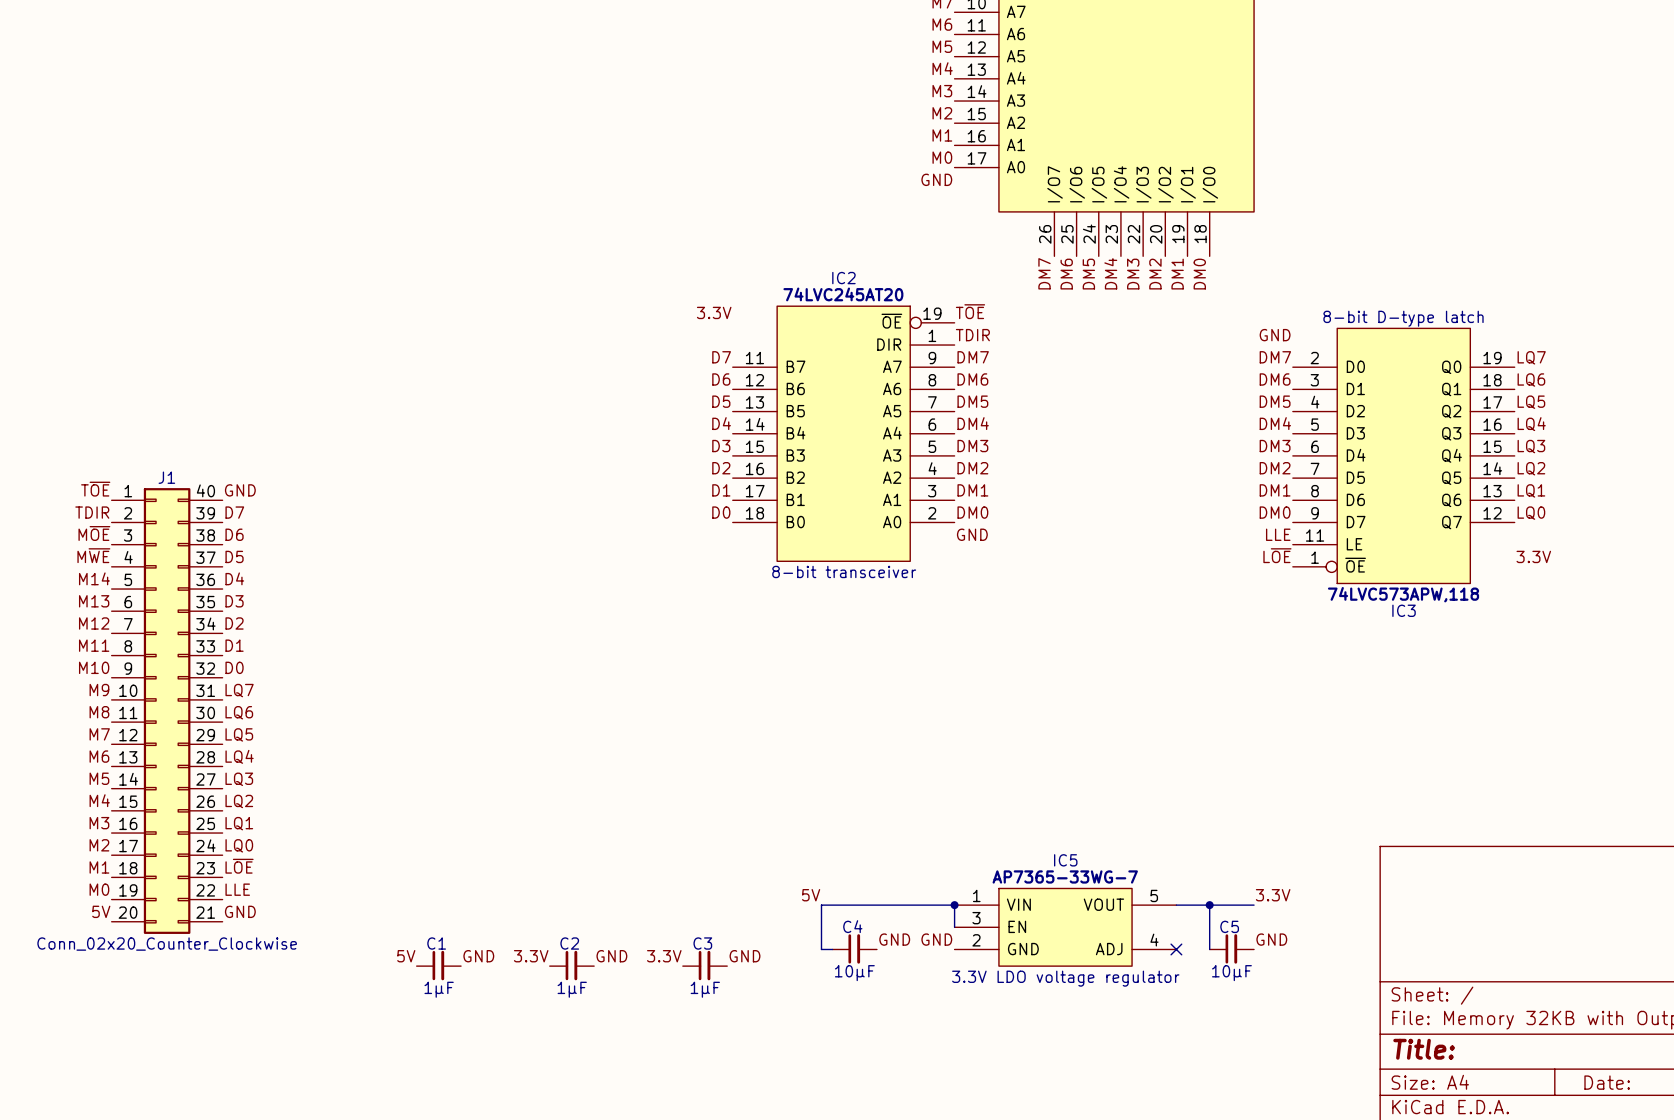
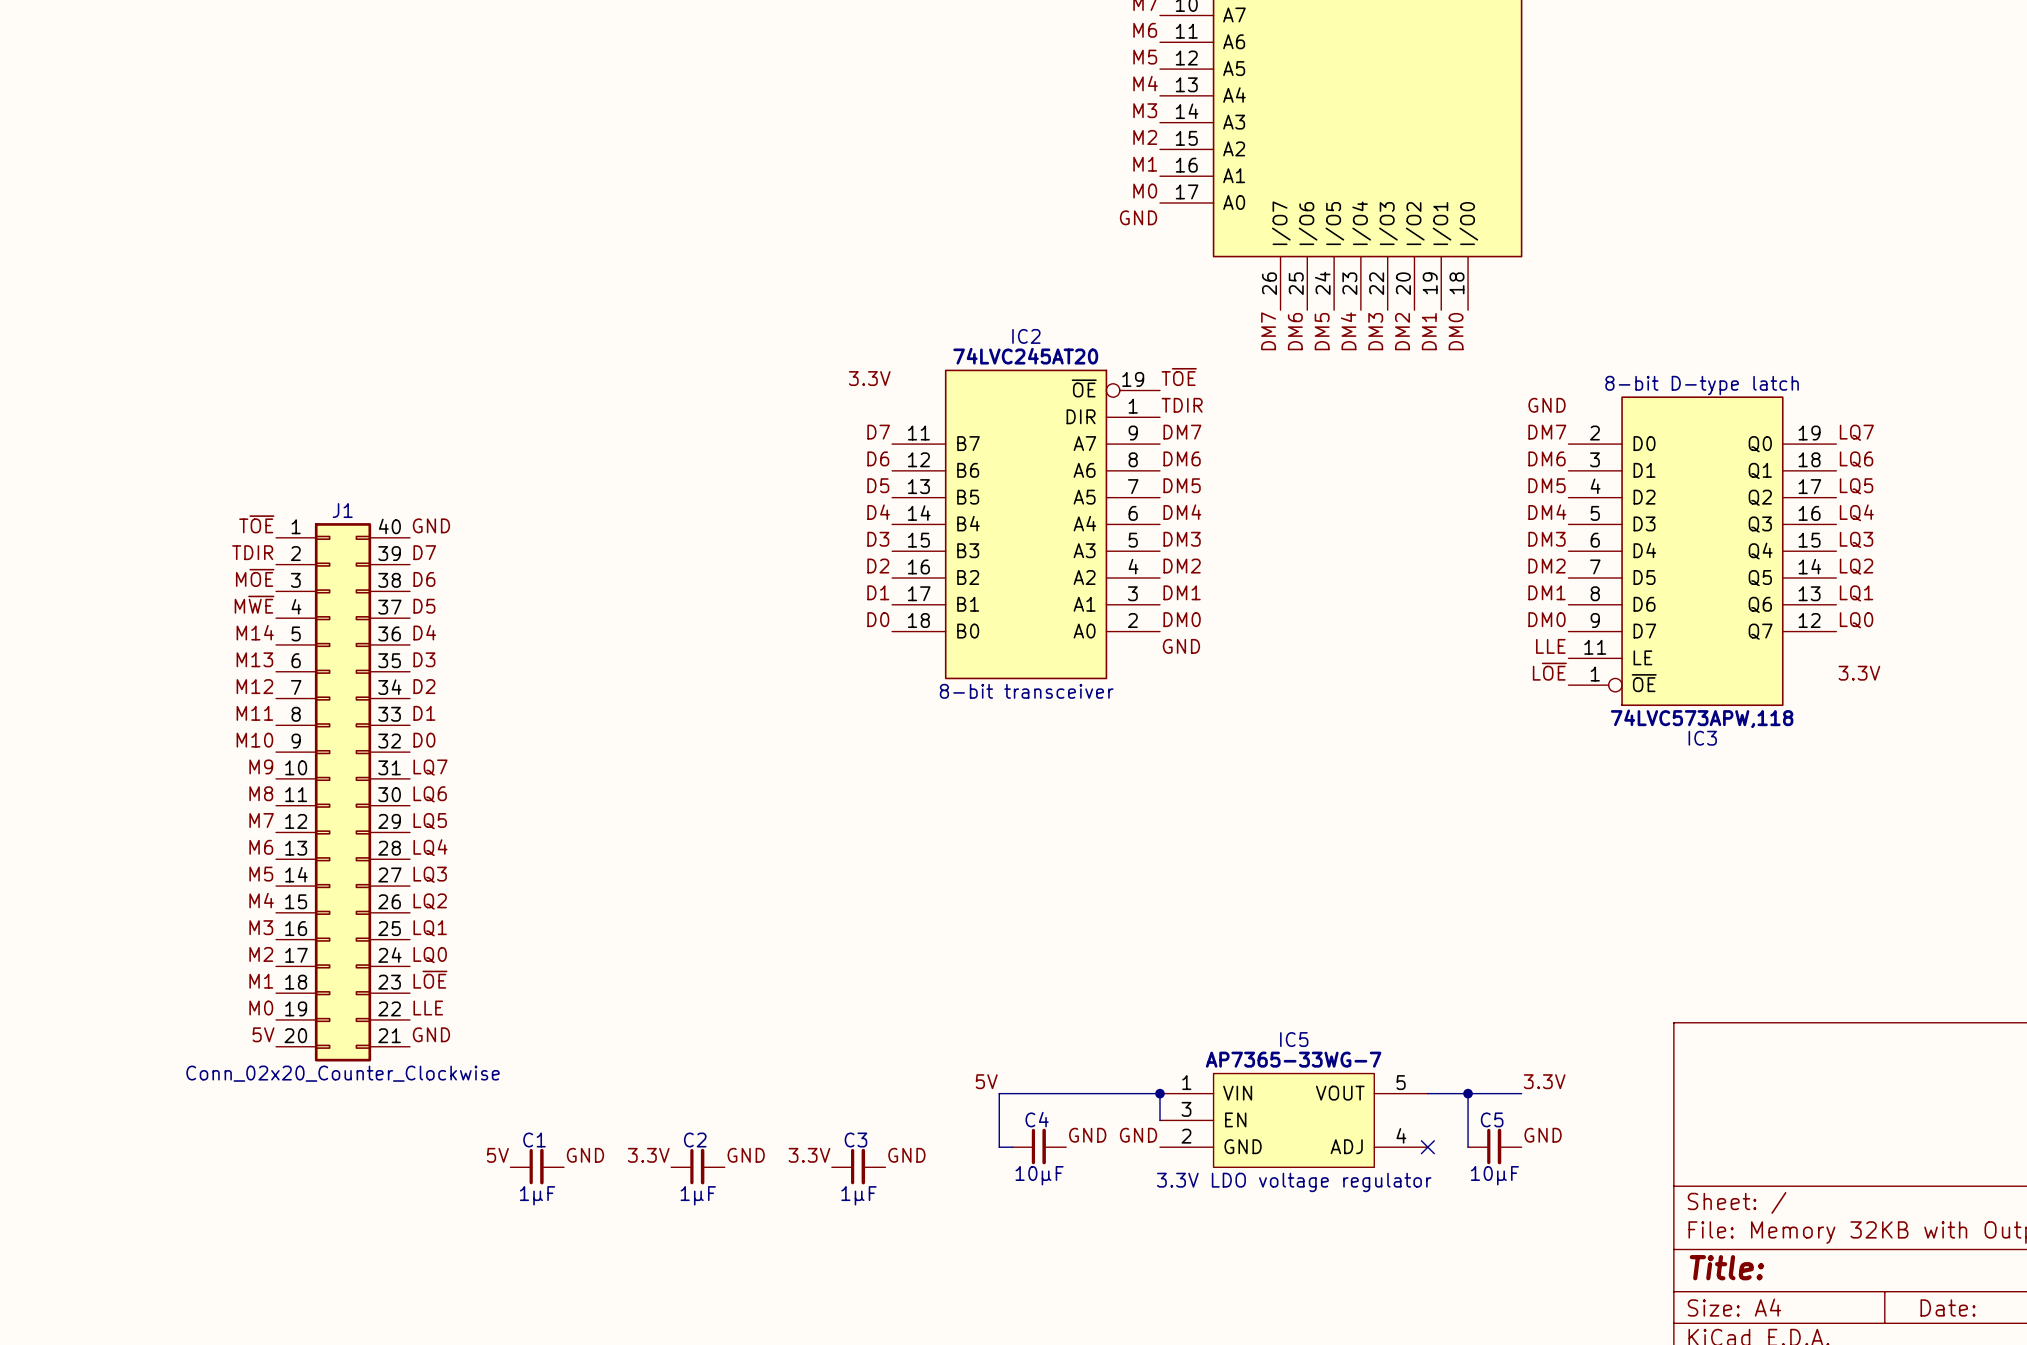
label position: T~{OE} (95, 489) -> T~{OE} (256, 524)
label position: GND (240, 490) -> GND (431, 525)
label position: TDIR (92, 512) -> TDIR (252, 552)
label position: D7 (234, 512) -> D7 (424, 552)
label position: M~{OE} (94, 533) -> M~{OE} (255, 577)
label position: D6 (234, 534) -> D6 (424, 579)
label position: M~{WE} (93, 555) -> M~{WE} (254, 604)
label position: D5 (234, 556) -> D5 (424, 606)
label position: M14 (94, 578) -> M14 (255, 632)
label position: D4 (234, 578) -> D4 (424, 632)
label position: M13 (94, 601) -> M13 (254, 659)
label position: D3 (234, 601) -> D3 (424, 659)
label position: M12 (94, 623) -> M12 (254, 686)
label position: D2 (234, 623) -> D2 (424, 686)
label position: M11 (94, 645) -> M11 (254, 713)
label position: D1 (234, 645) -> D1 (424, 713)
label position: M10 (94, 667) -> M10 (254, 740)
label position: D0 (234, 667) -> D0 (424, 740)
label position: M9 (99, 690) -> M9 (261, 766)
label position: LQ7 (239, 690) -> LQ7 (430, 767)
J1 position: (167, 711) -> (343, 792)
label position: M8 (99, 712) -> M8 (261, 793)
label position: LQ6 (239, 712) -> LQ6 (430, 794)
label position: M7 (99, 734) -> M7 (261, 820)
label position: LQ5 (239, 734) -> LQ5 (430, 821)
label position: M6 (99, 756) -> M6 (261, 847)
label position: LQ4 (239, 756) -> LQ4 (430, 847)
label position: M5 (99, 778) -> M5 (261, 874)
label position: LQ3 (239, 779) -> LQ3 (430, 874)
label position: M4 (99, 800) -> M4 (261, 900)
label position: LQ2 (239, 801) -> LQ2 (430, 901)
label position: M3 (99, 823) -> M3 (261, 927)
label position: LQ1 (239, 823) -> LQ1 (430, 928)
label position: M2 (99, 845) -> M2 (261, 954)
label position: LQ0 (239, 845) -> LQ0 (430, 955)
label position: L~{OE} (239, 866) -> L~{OE} (430, 979)
label position: M1 (99, 867) -> M1 (261, 981)
label position: M0 (99, 889) -> M0 (261, 1008)
label position: LLE (237, 889) -> LLE (428, 1008)
label position: 5V (101, 911) -> 5V (263, 1034)
label position: GND (240, 911) -> GND (431, 1034)

